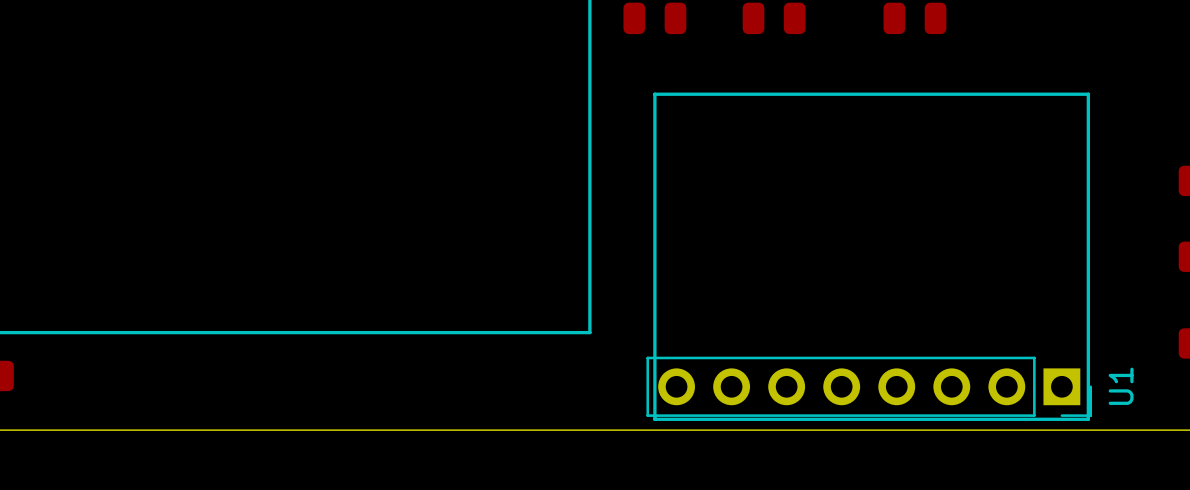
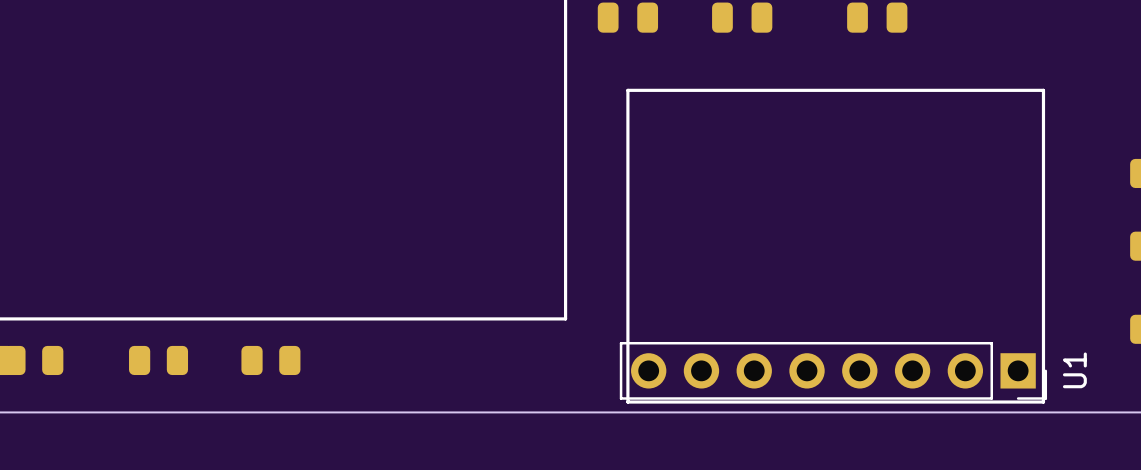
part: none -> (33, 360)
part: none -> (158, 360)
part: none -> (270, 360)

